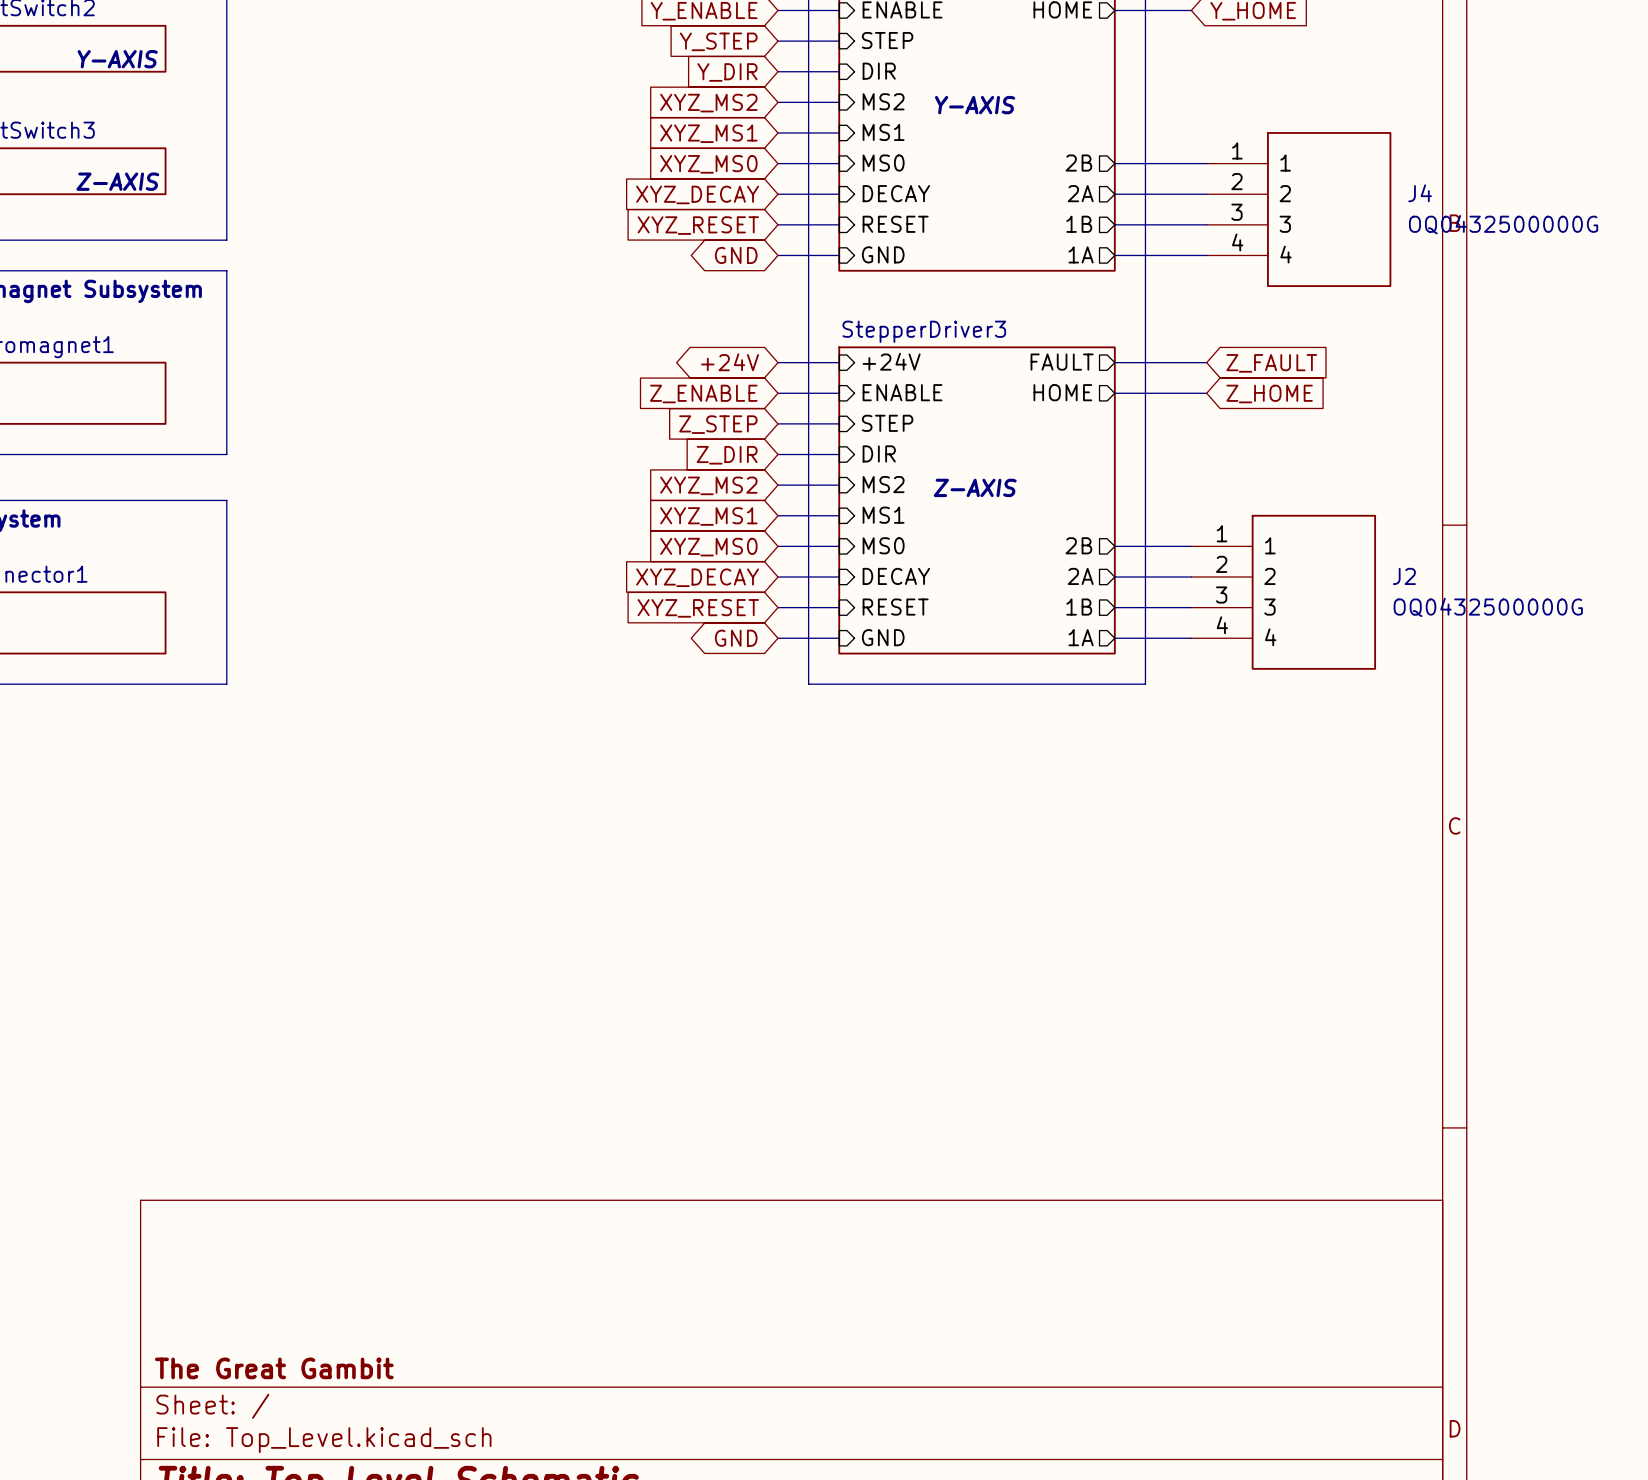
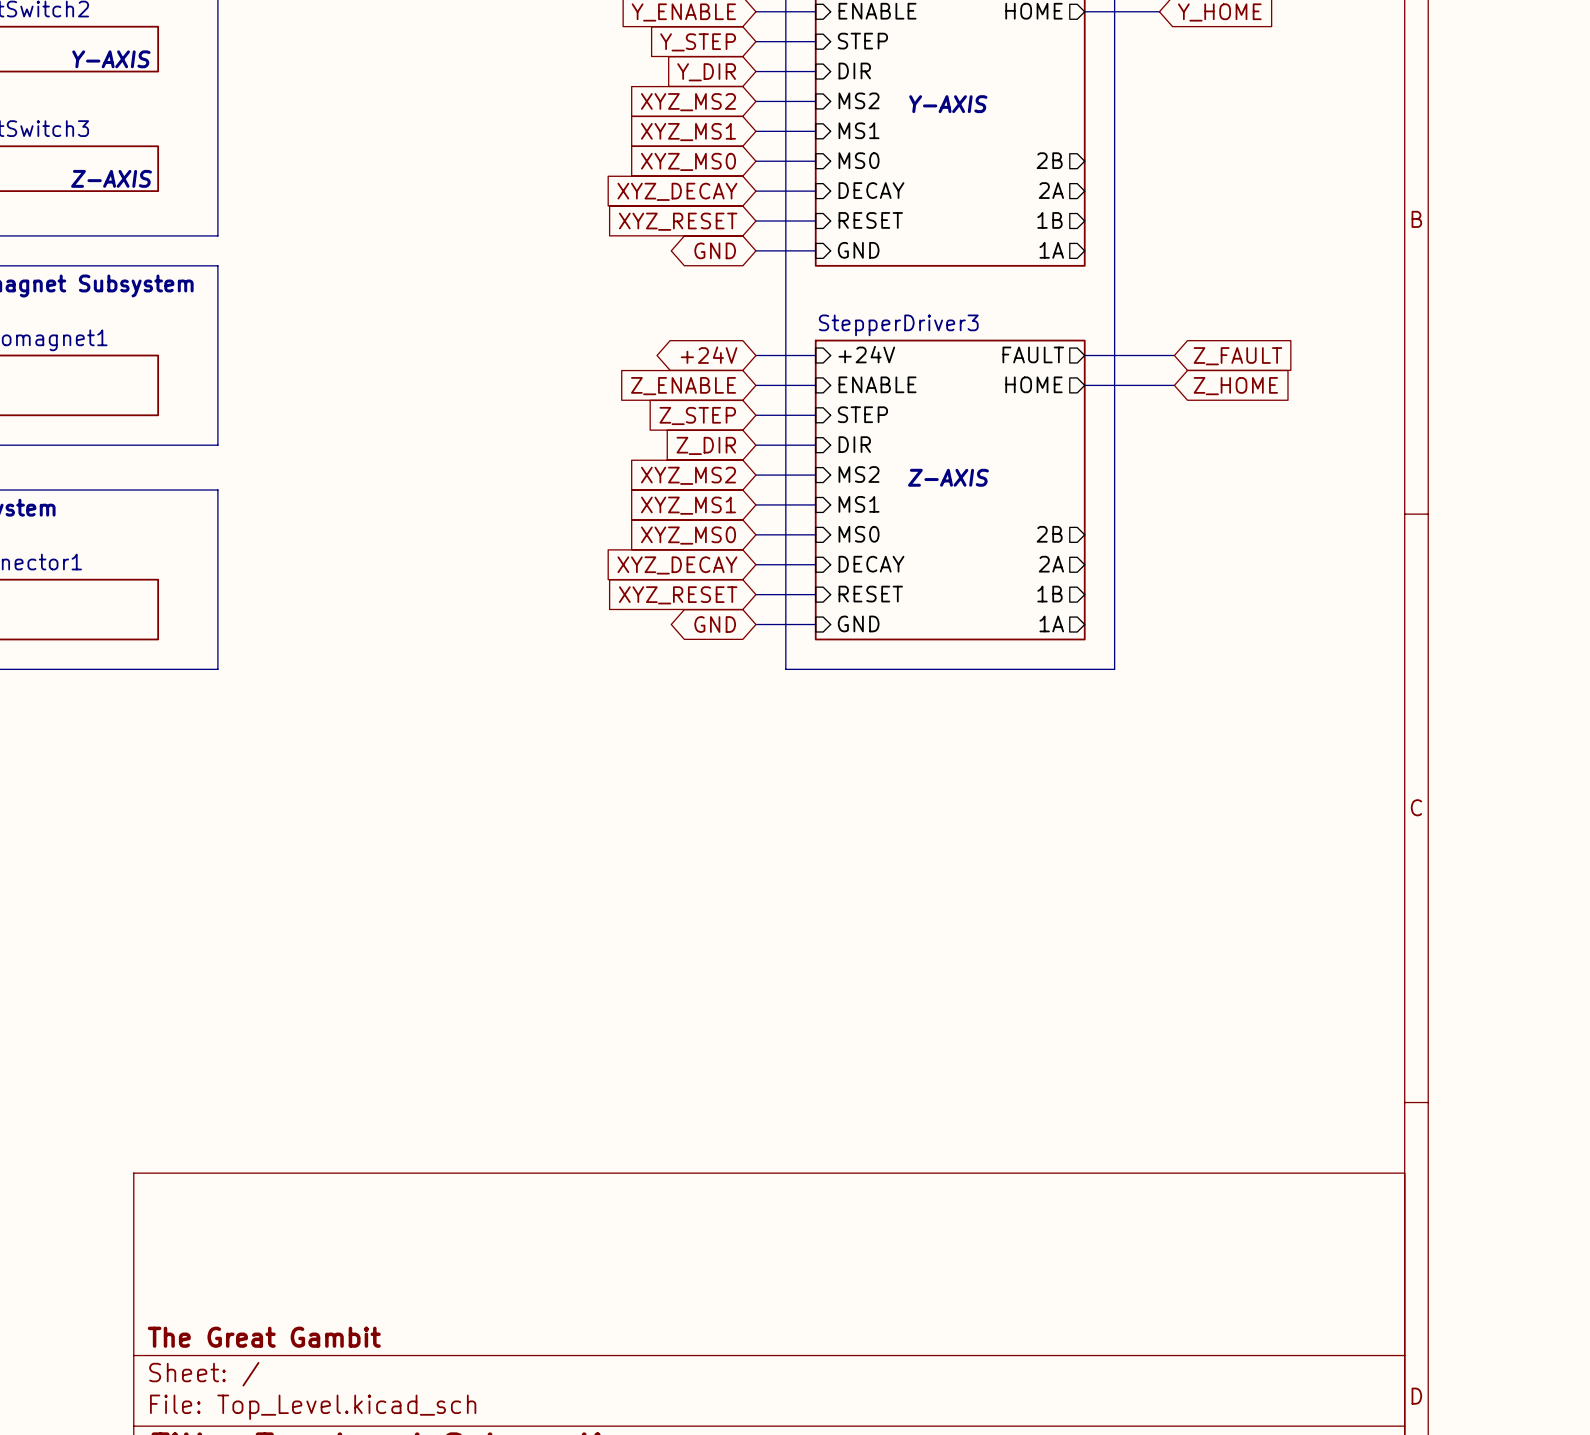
wire: (1114, 163) (1206, 163) -> none
wire: (1114, 194) (1206, 194) -> none
J4: OQ0432500000G (1299, 209) -> none
wire: (1114, 224) (1206, 224) -> none
wire: (1114, 255) (1206, 255) -> none
wire: (1114, 546) (1191, 546) -> none
wire: (1114, 577) (1191, 577) -> none
J2: OQ0432500000G (1283, 592) -> none
wire: (1114, 607) (1191, 607) -> none
wire: (1114, 638) (1191, 638) -> none

